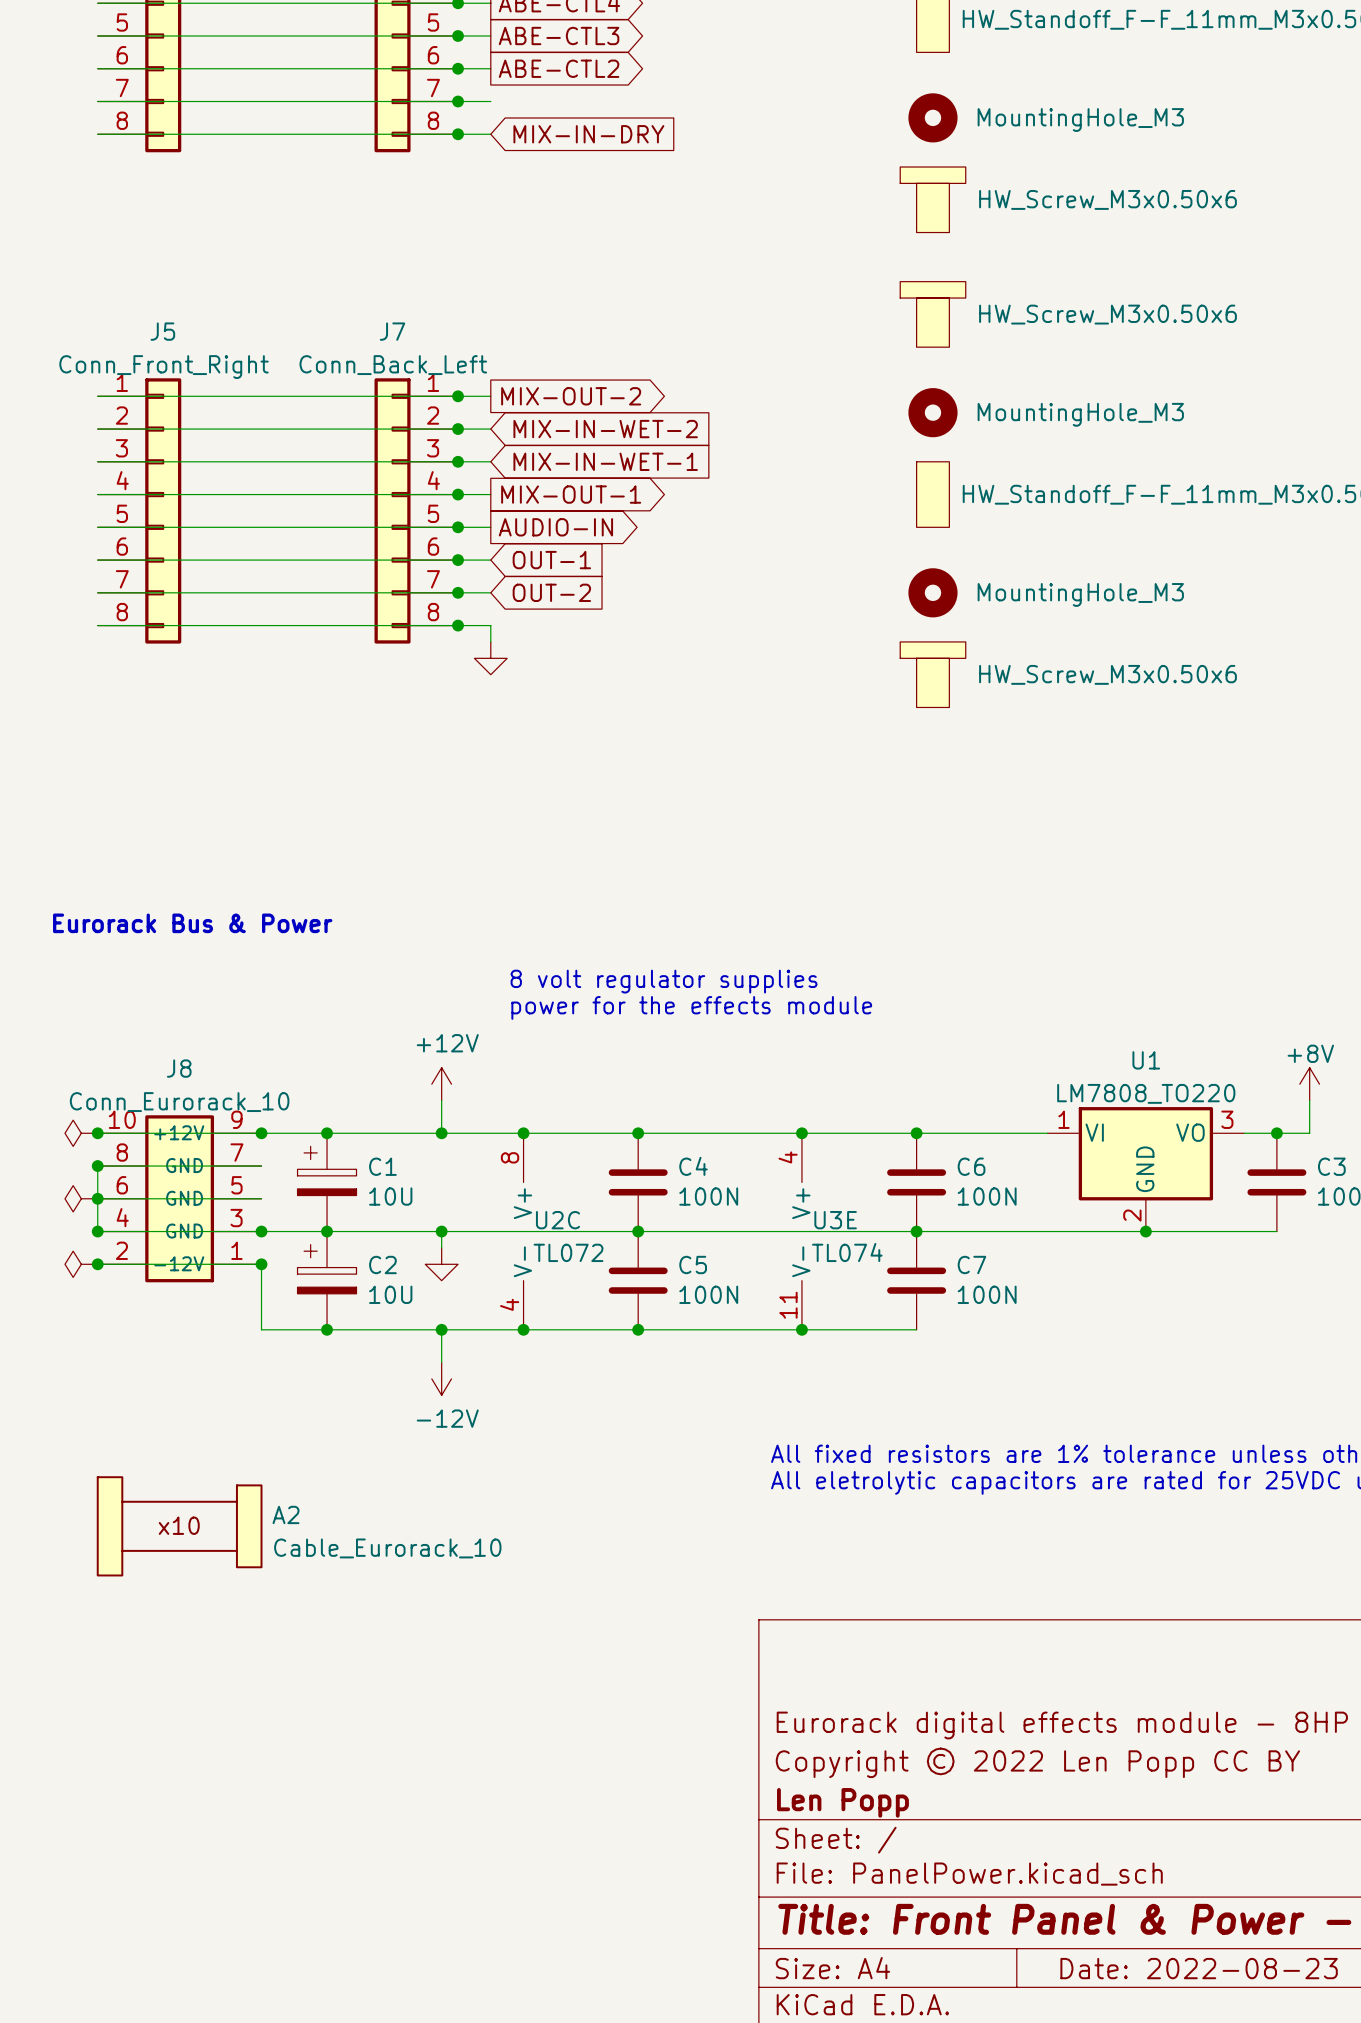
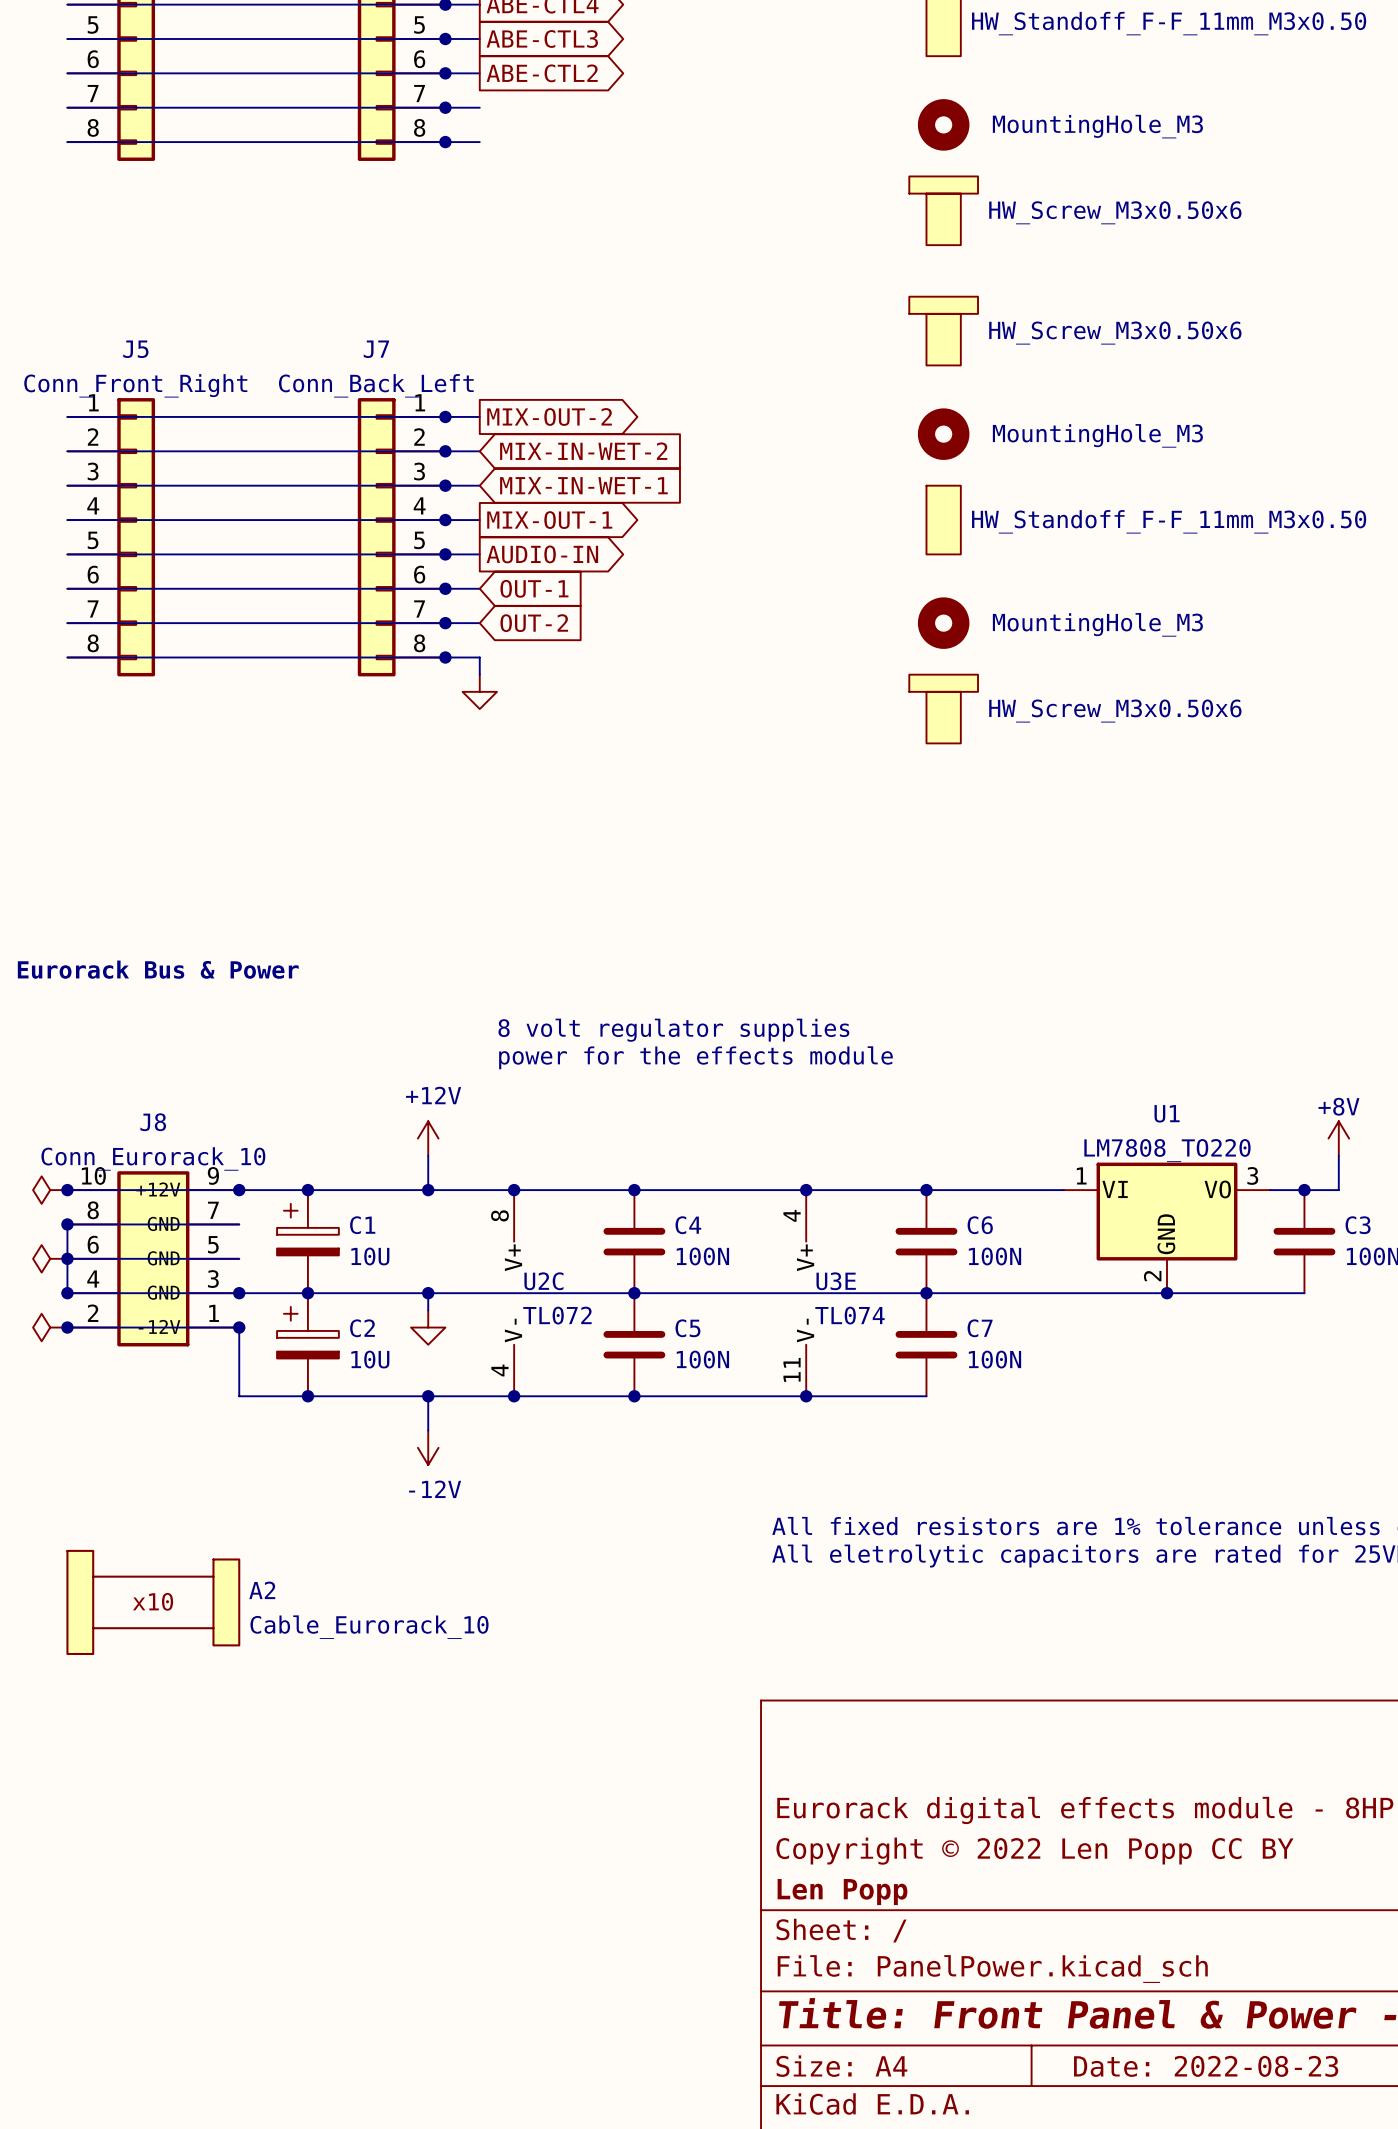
global label: MIX-IN-DRY (588, 134) -> none

